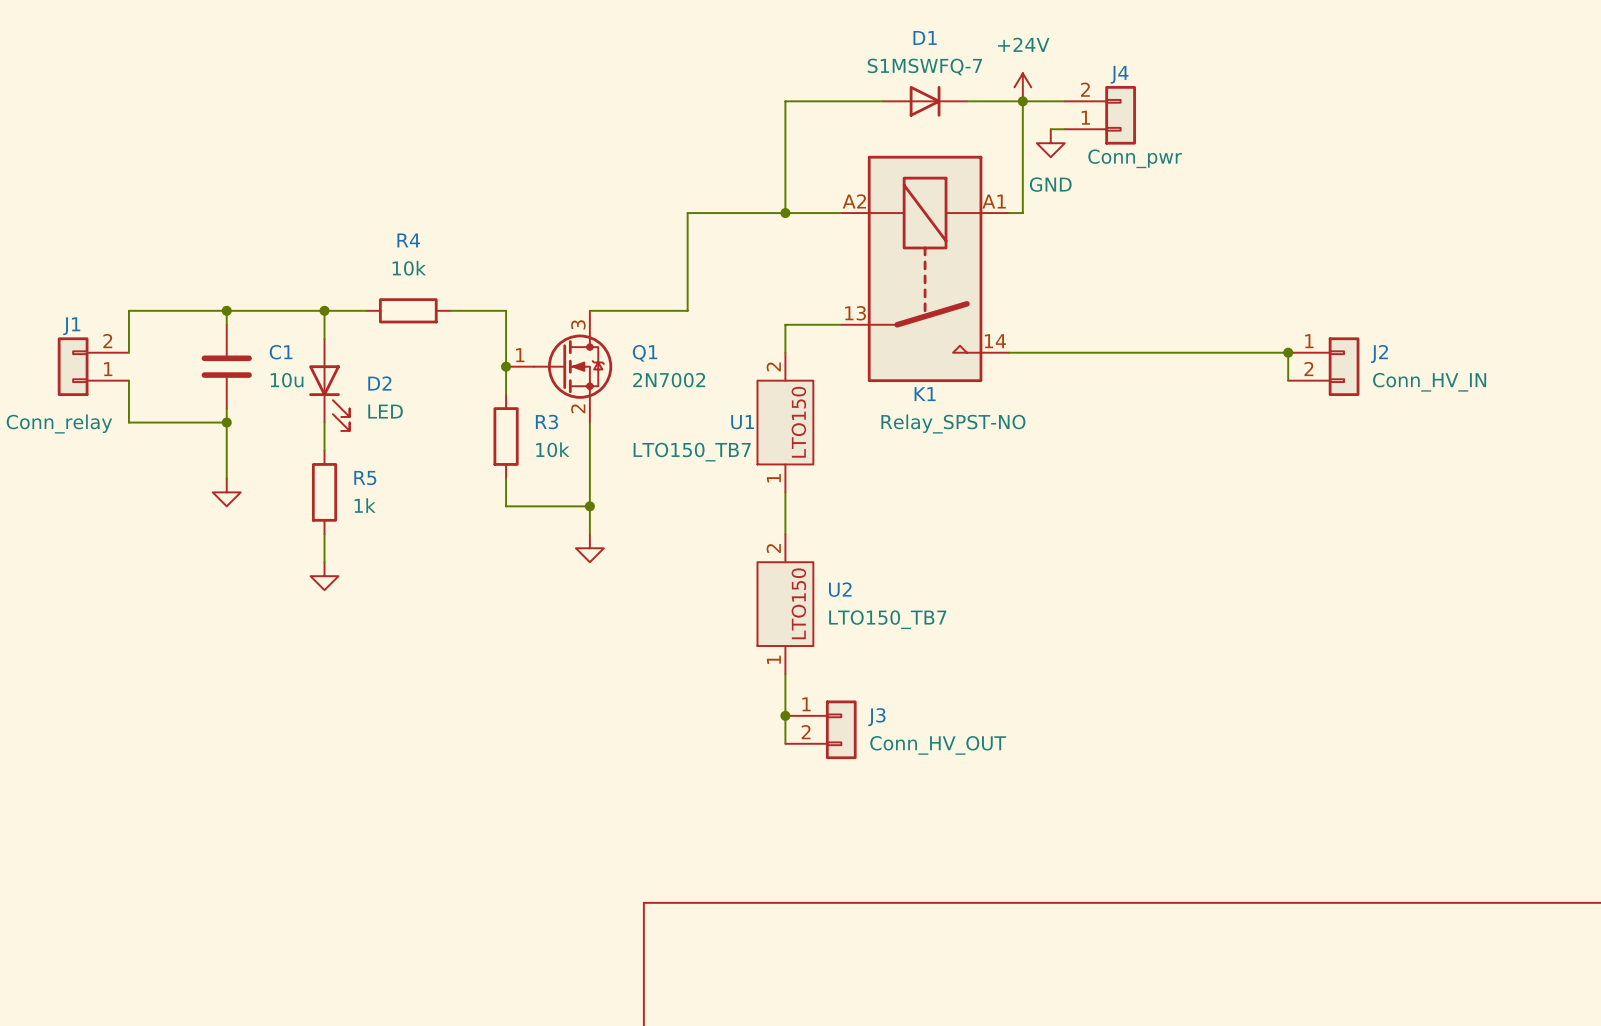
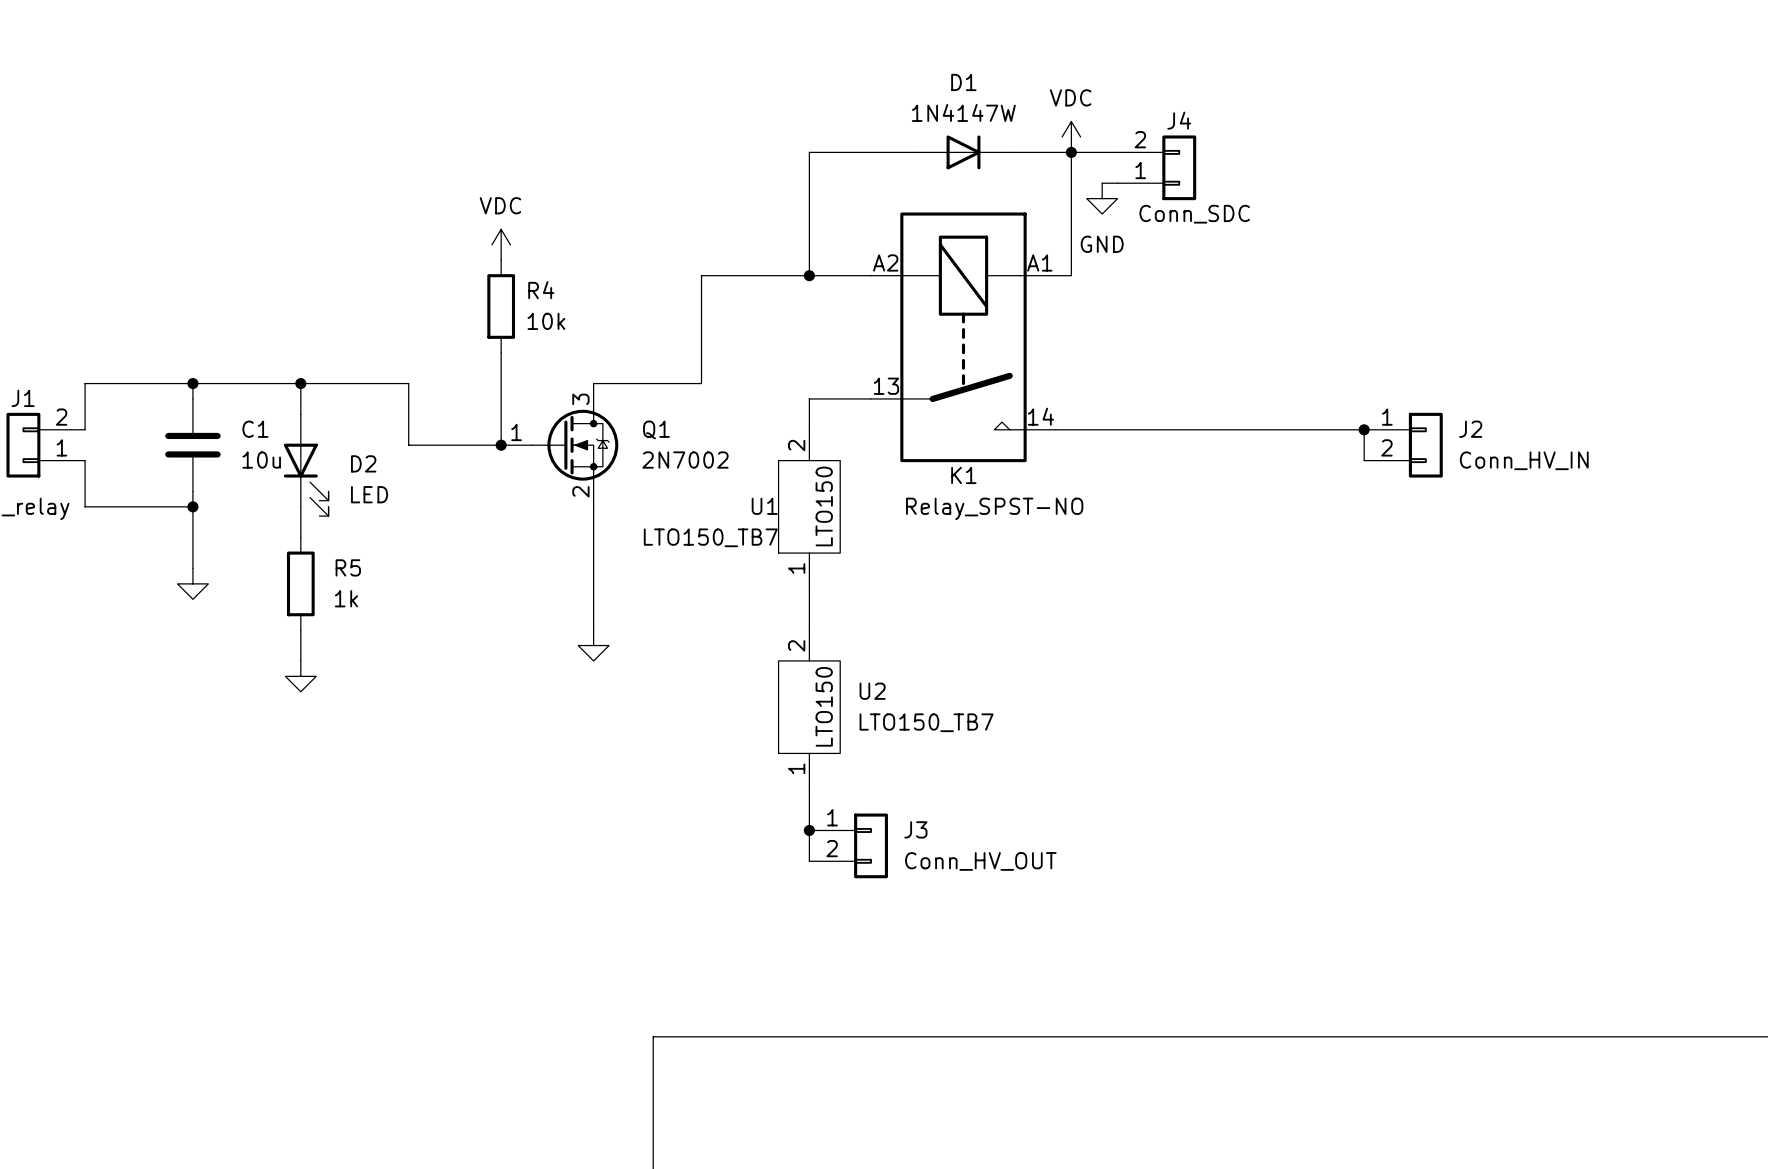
D1 value: S1MSWFQ-7 (924, 66) -> 1N4147W (963, 112)
power symbol: +24V (1022, 87) -> VDC (1071, 136)
J4 value: Conn_pwr (1135, 158) -> Conn_SDC (1194, 214)
power symbol: none -> VDC (501, 244)
R4 name position: R4 (408, 240) -> R4 (541, 290)
R4 rotation: 0° (408, 310) -> 90° clockwise (501, 306)
R4 position: (408, 310) -> (501, 306)
wire: (450, 310) (506, 310) -> (501, 352) (501, 383)
wire: (506, 366) (506, 394) -> (501, 445) (408, 445) (408, 383) (347, 383)
R3: 10k (506, 436) -> none
wire: (506, 478) (506, 506) (589, 506) -> none
junction: (589, 506) -> none

